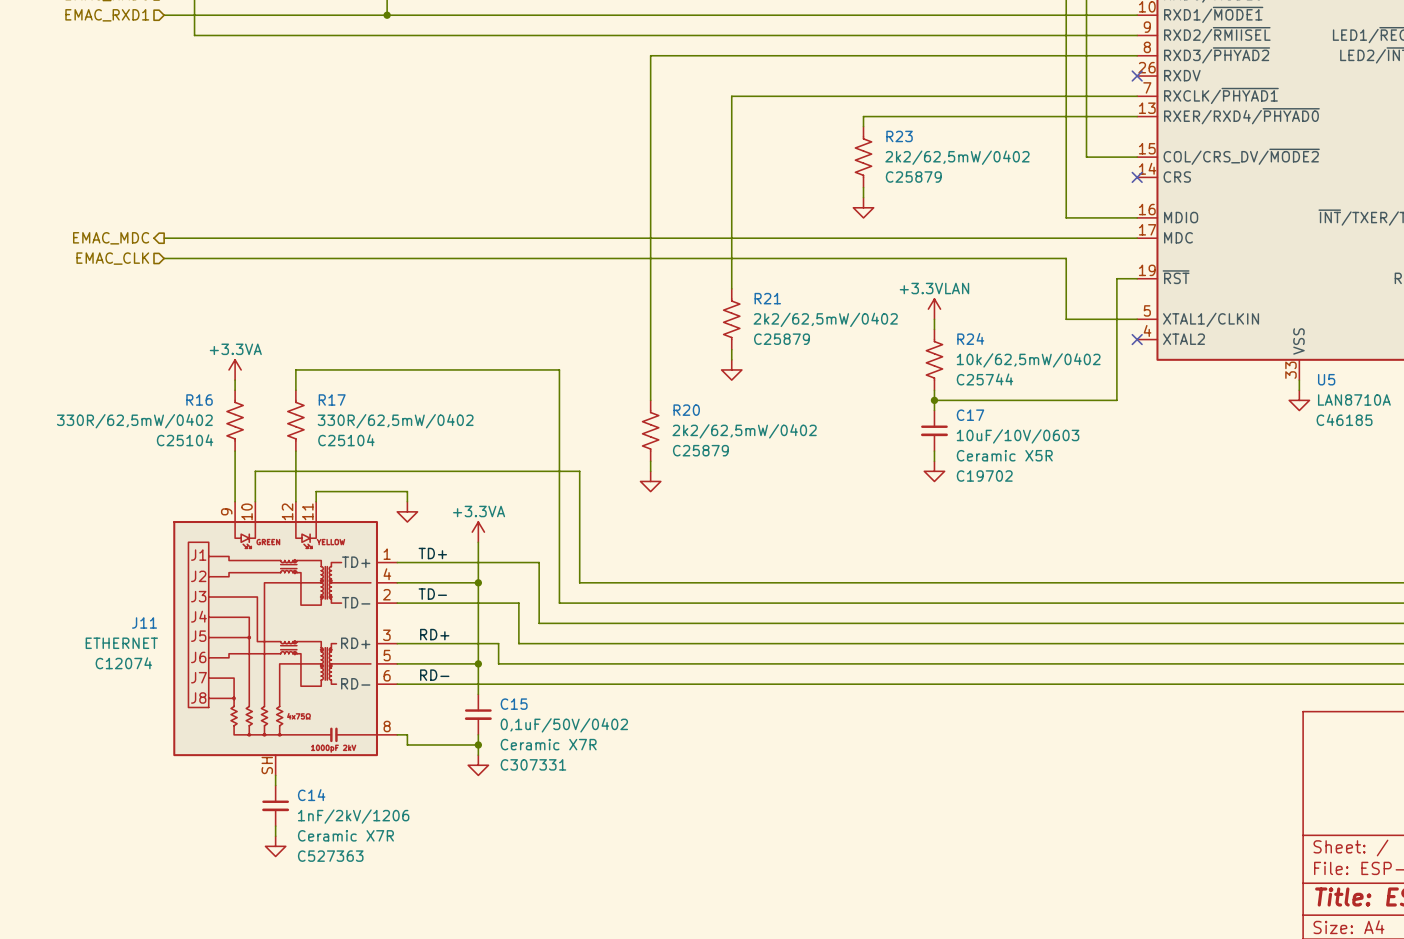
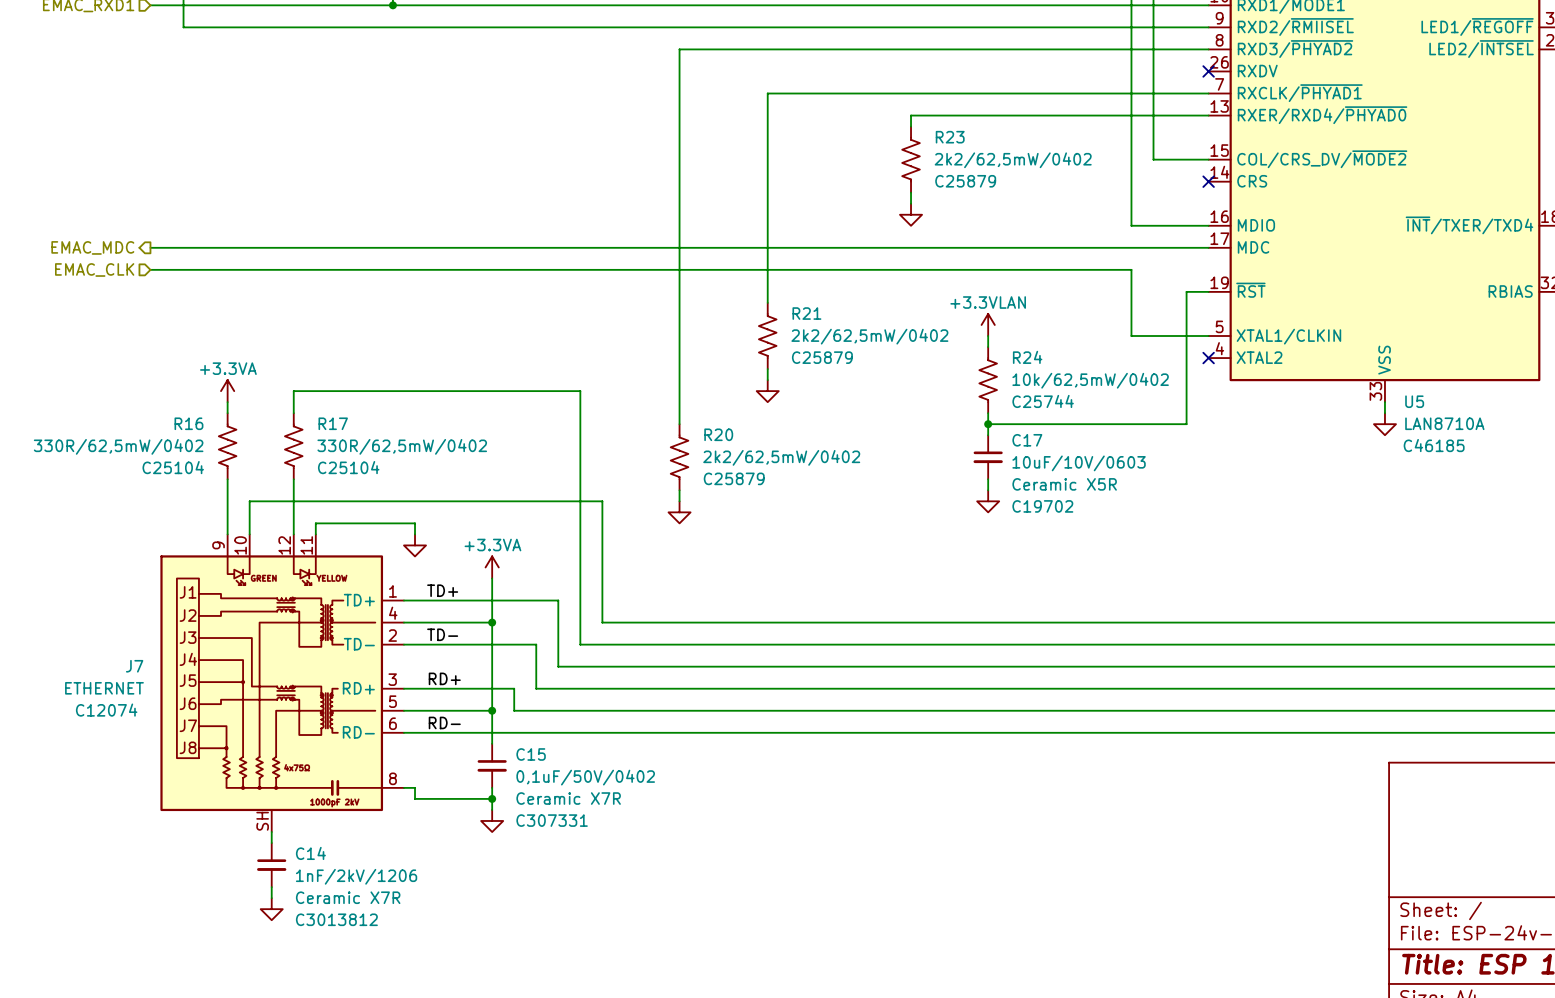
J11 name: J11 (144, 622) -> J7 (134, 666)
C14 text: C527363 (330, 856) -> C3013812 (336, 919)

